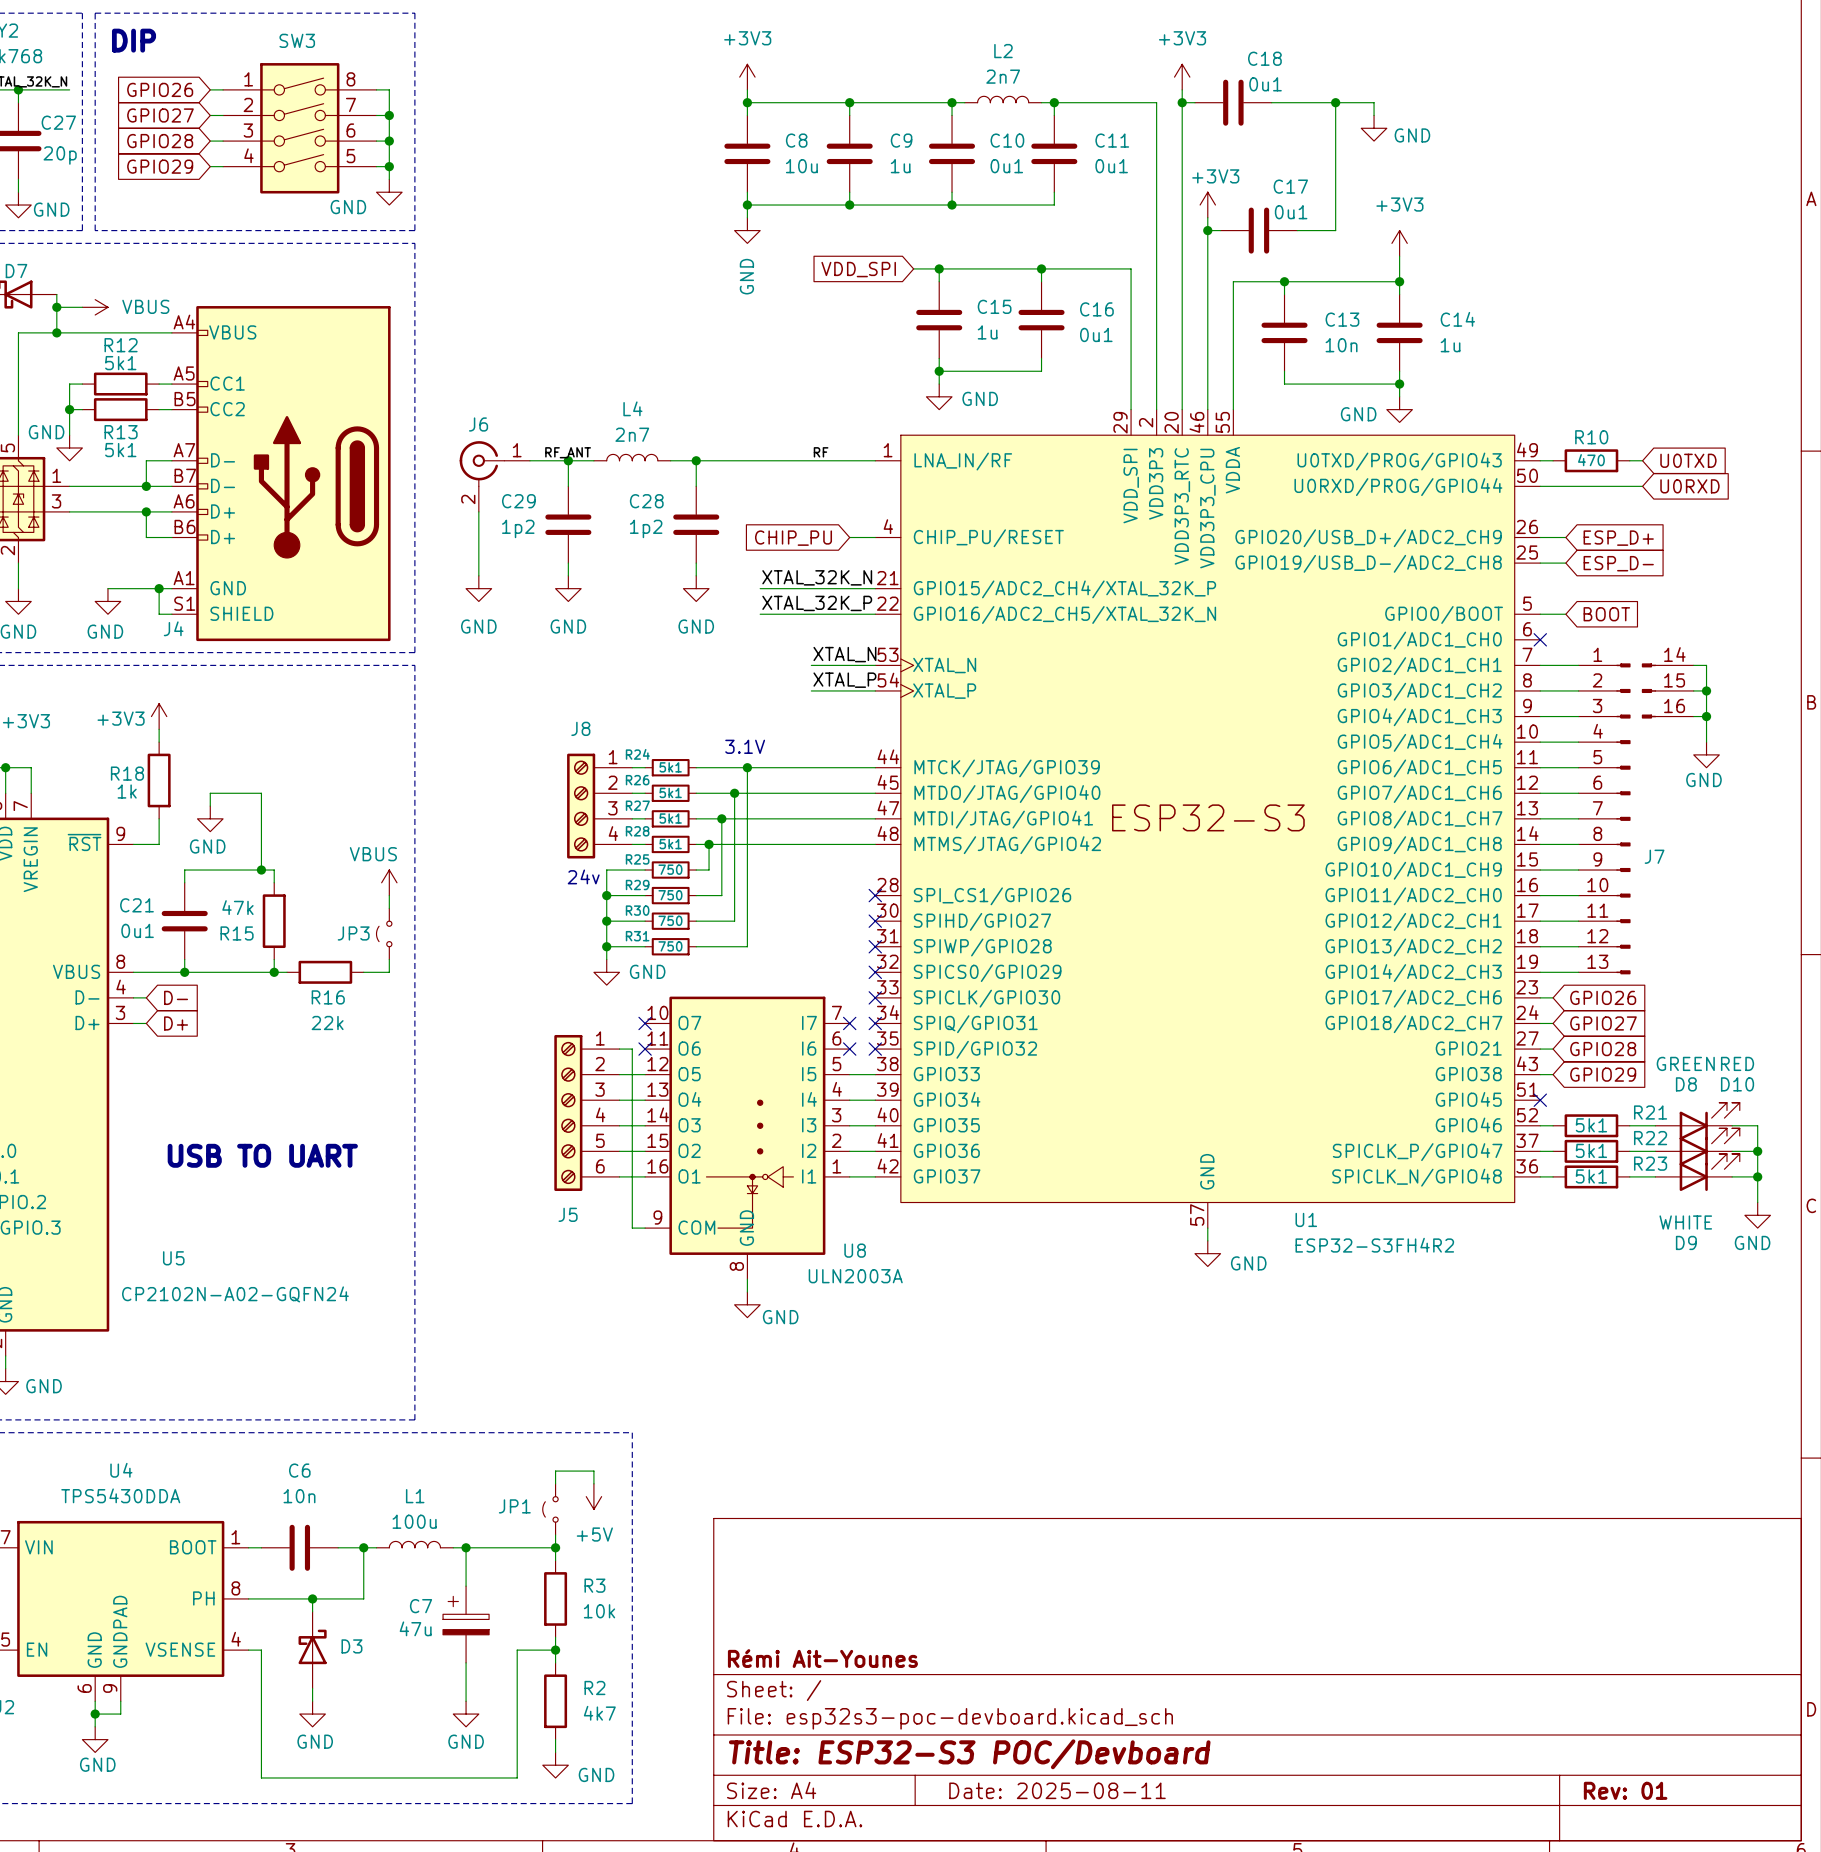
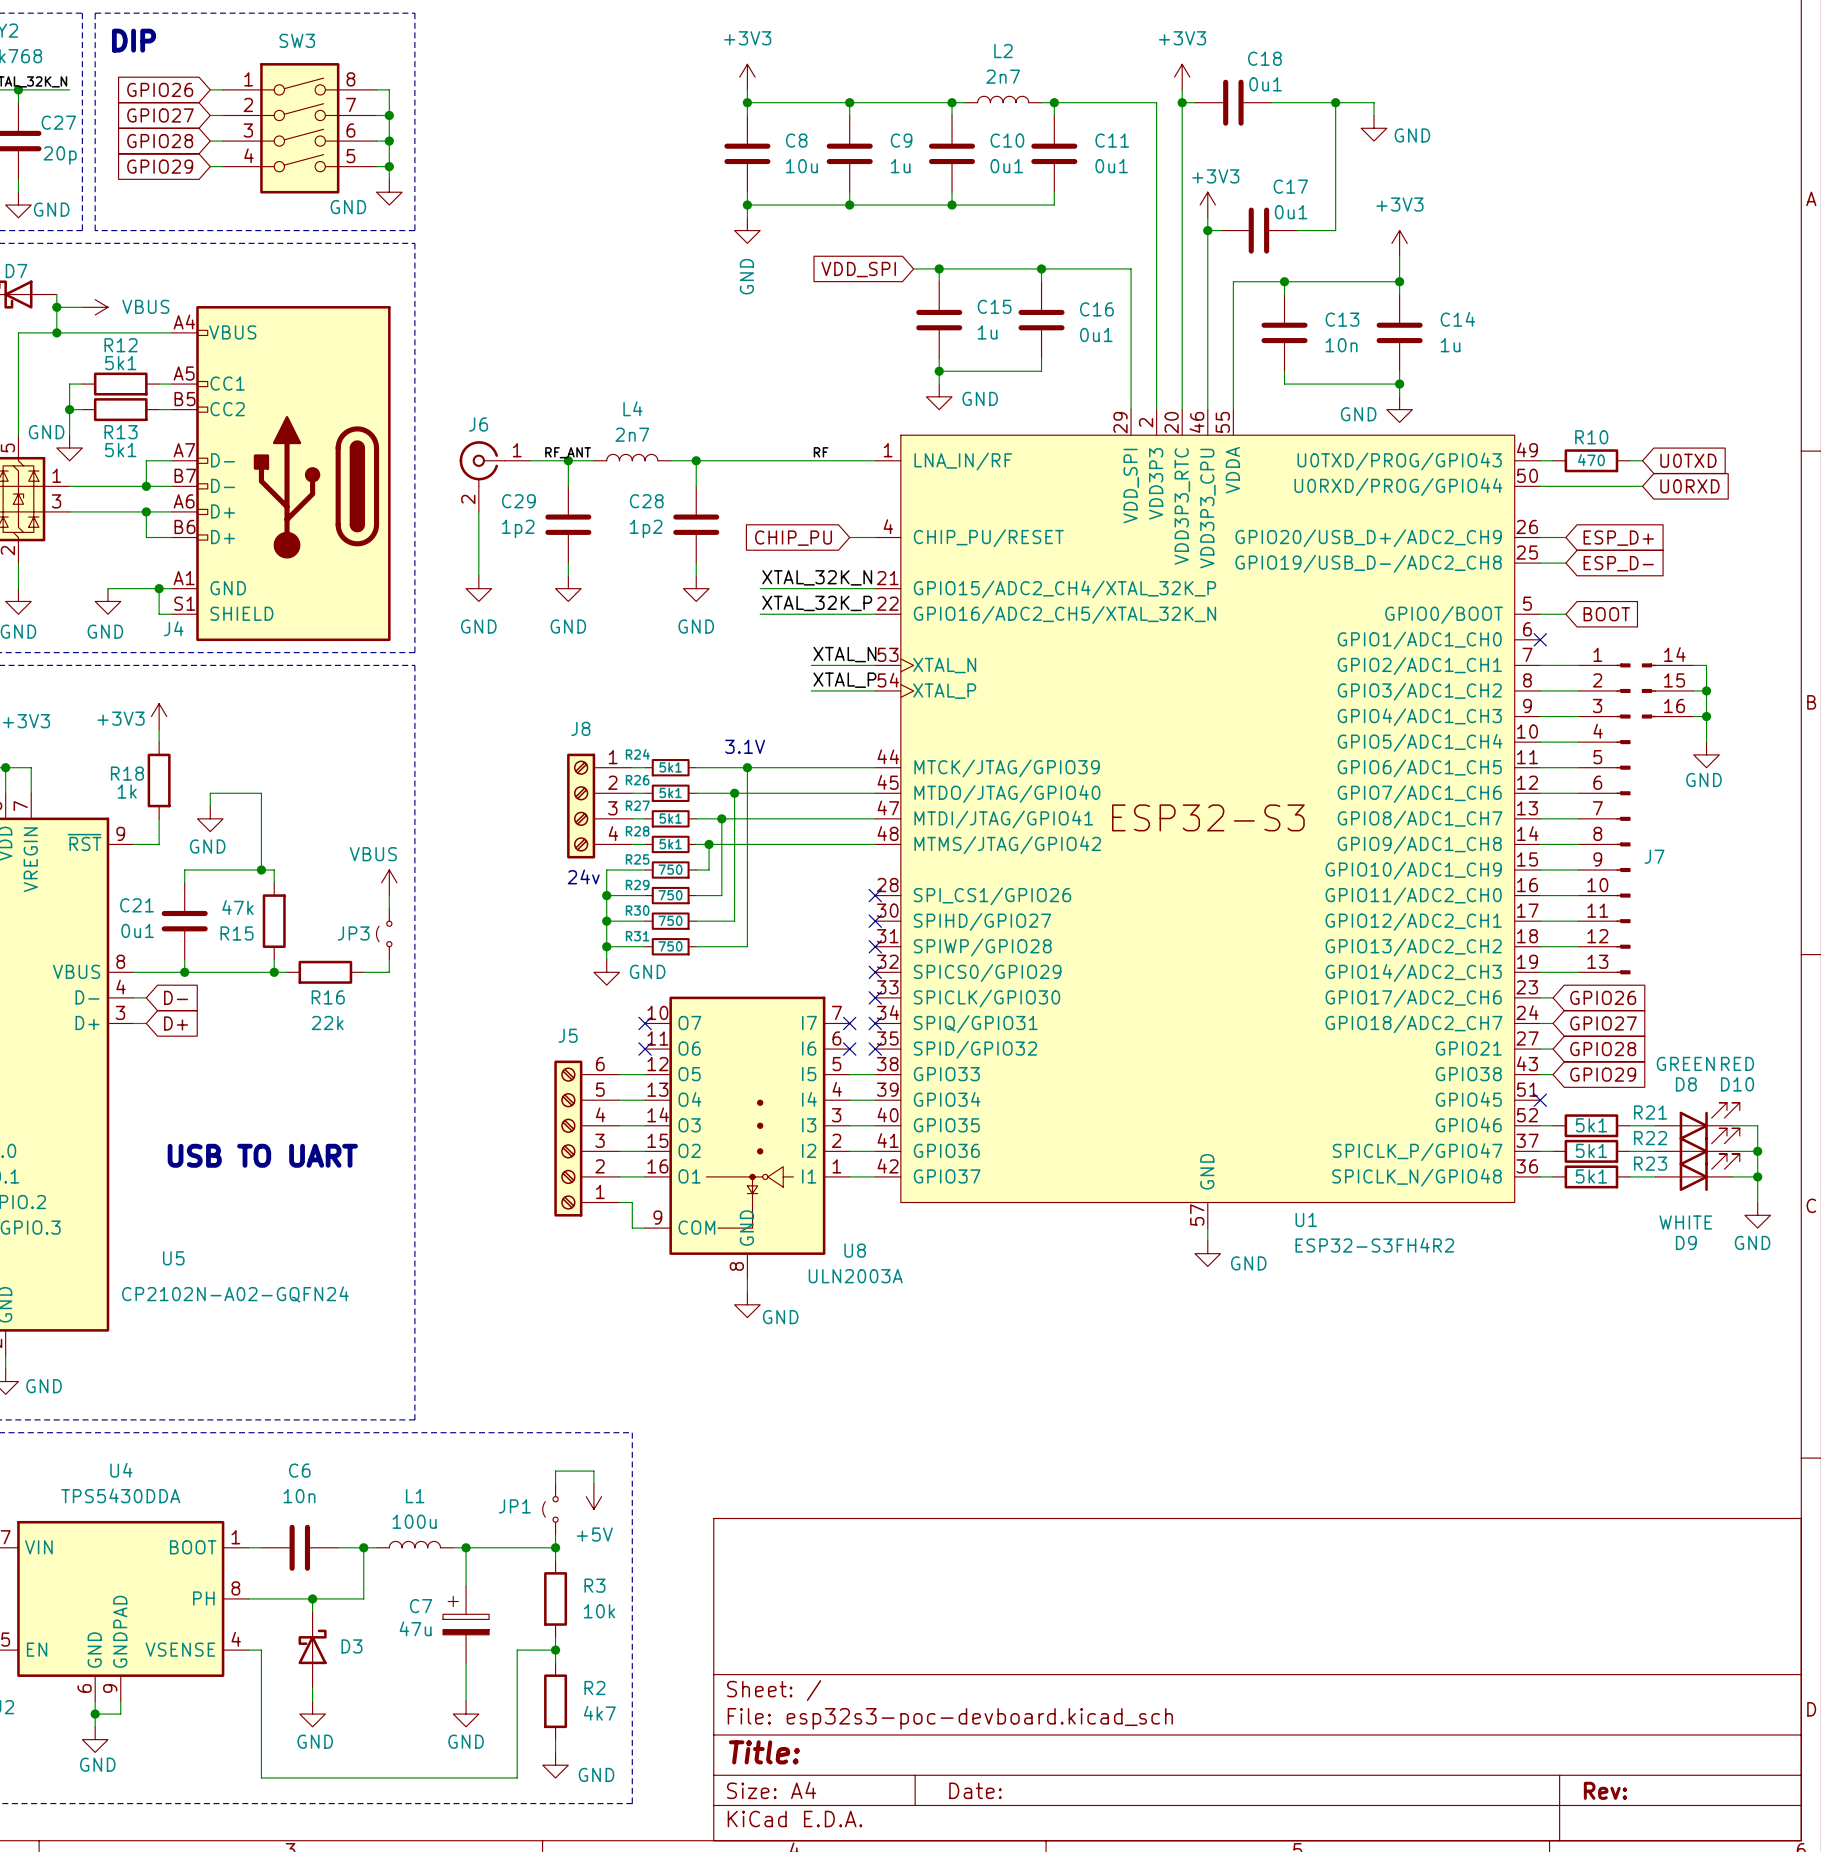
wire: (619, 1049) (632, 1049) (632, 1202) -> (619, 1202) (632, 1202)
J5 flip: as is (568, 1112) -> up-down (568, 1138)
title block: Rémi Ait-Younes (822, 1658) -> none
title block: Title: ESP32-S3 POC/Devboard (969, 1754) -> Title: (764, 1752)
title block: Date: 2025-08-11 (1057, 1790) -> Date: (975, 1790)
title block: Rev: 01 (1625, 1790) -> Rev: (1605, 1790)

